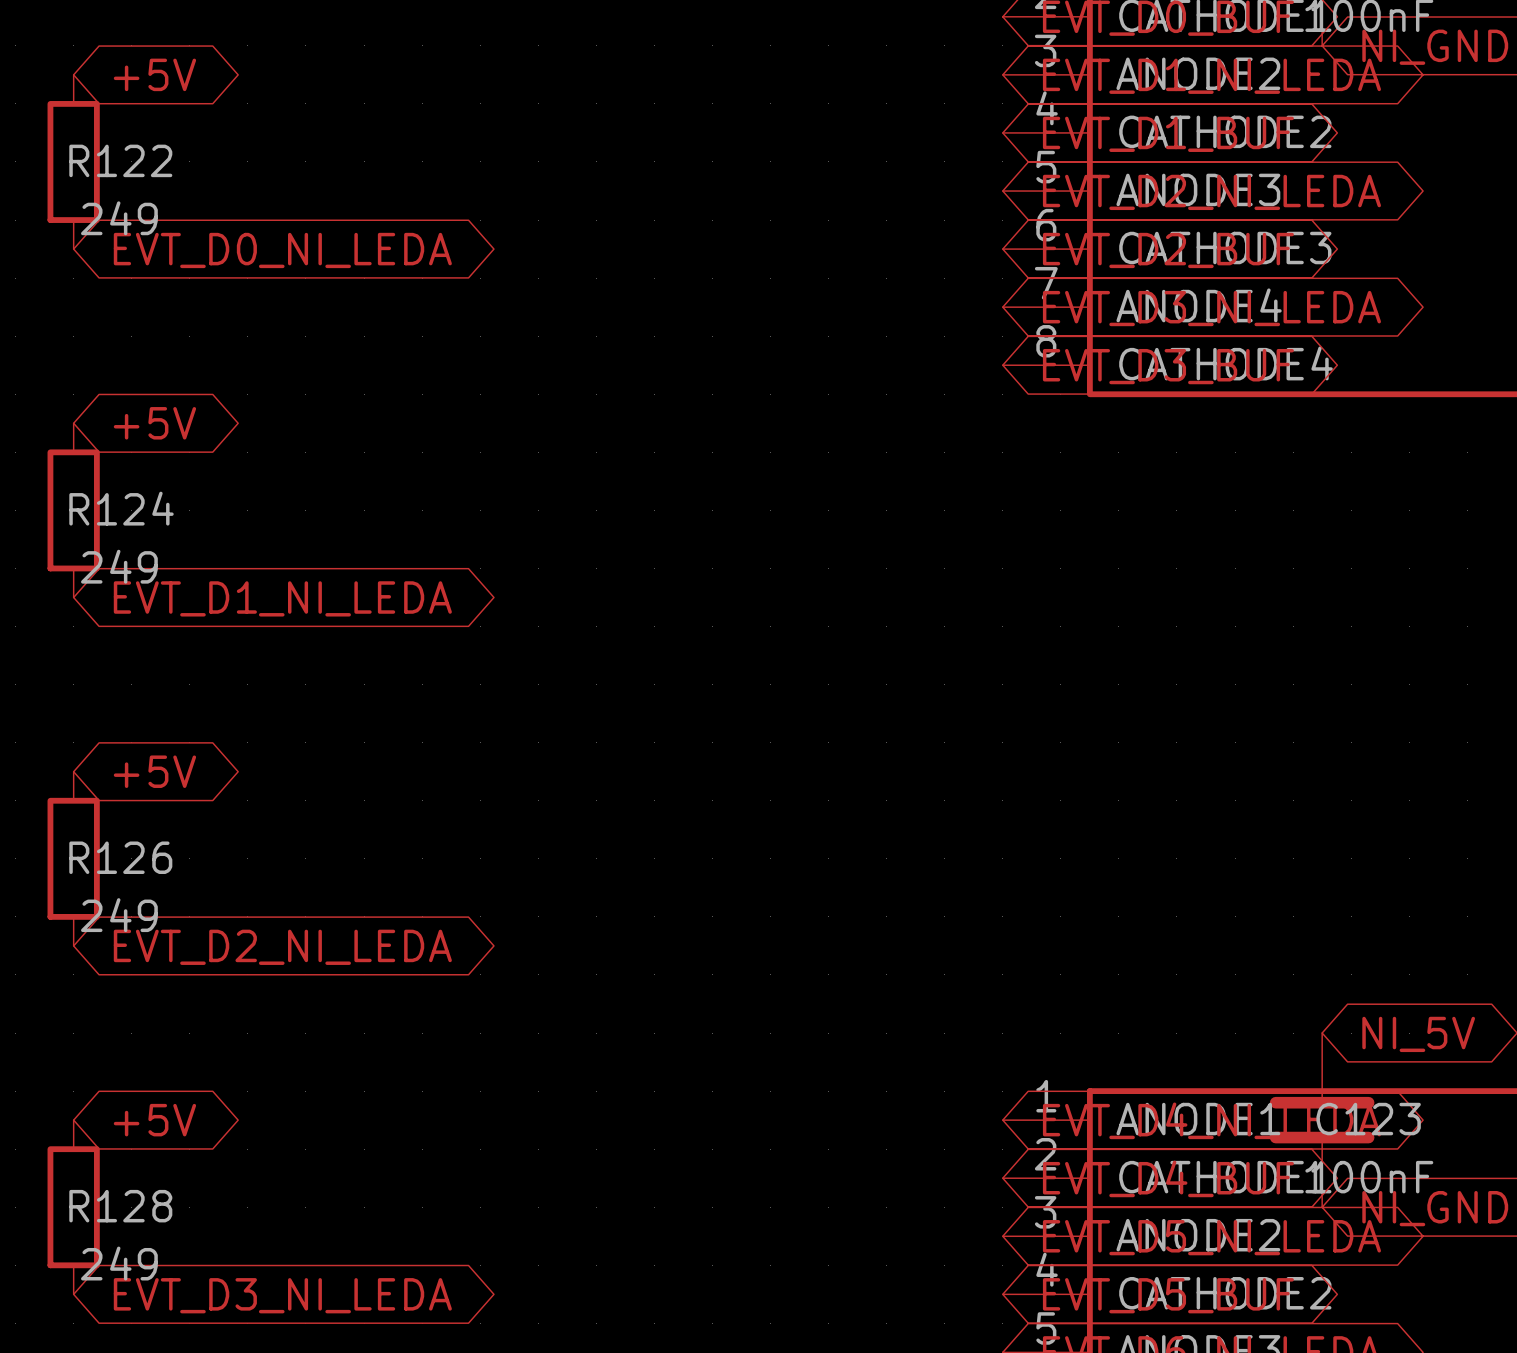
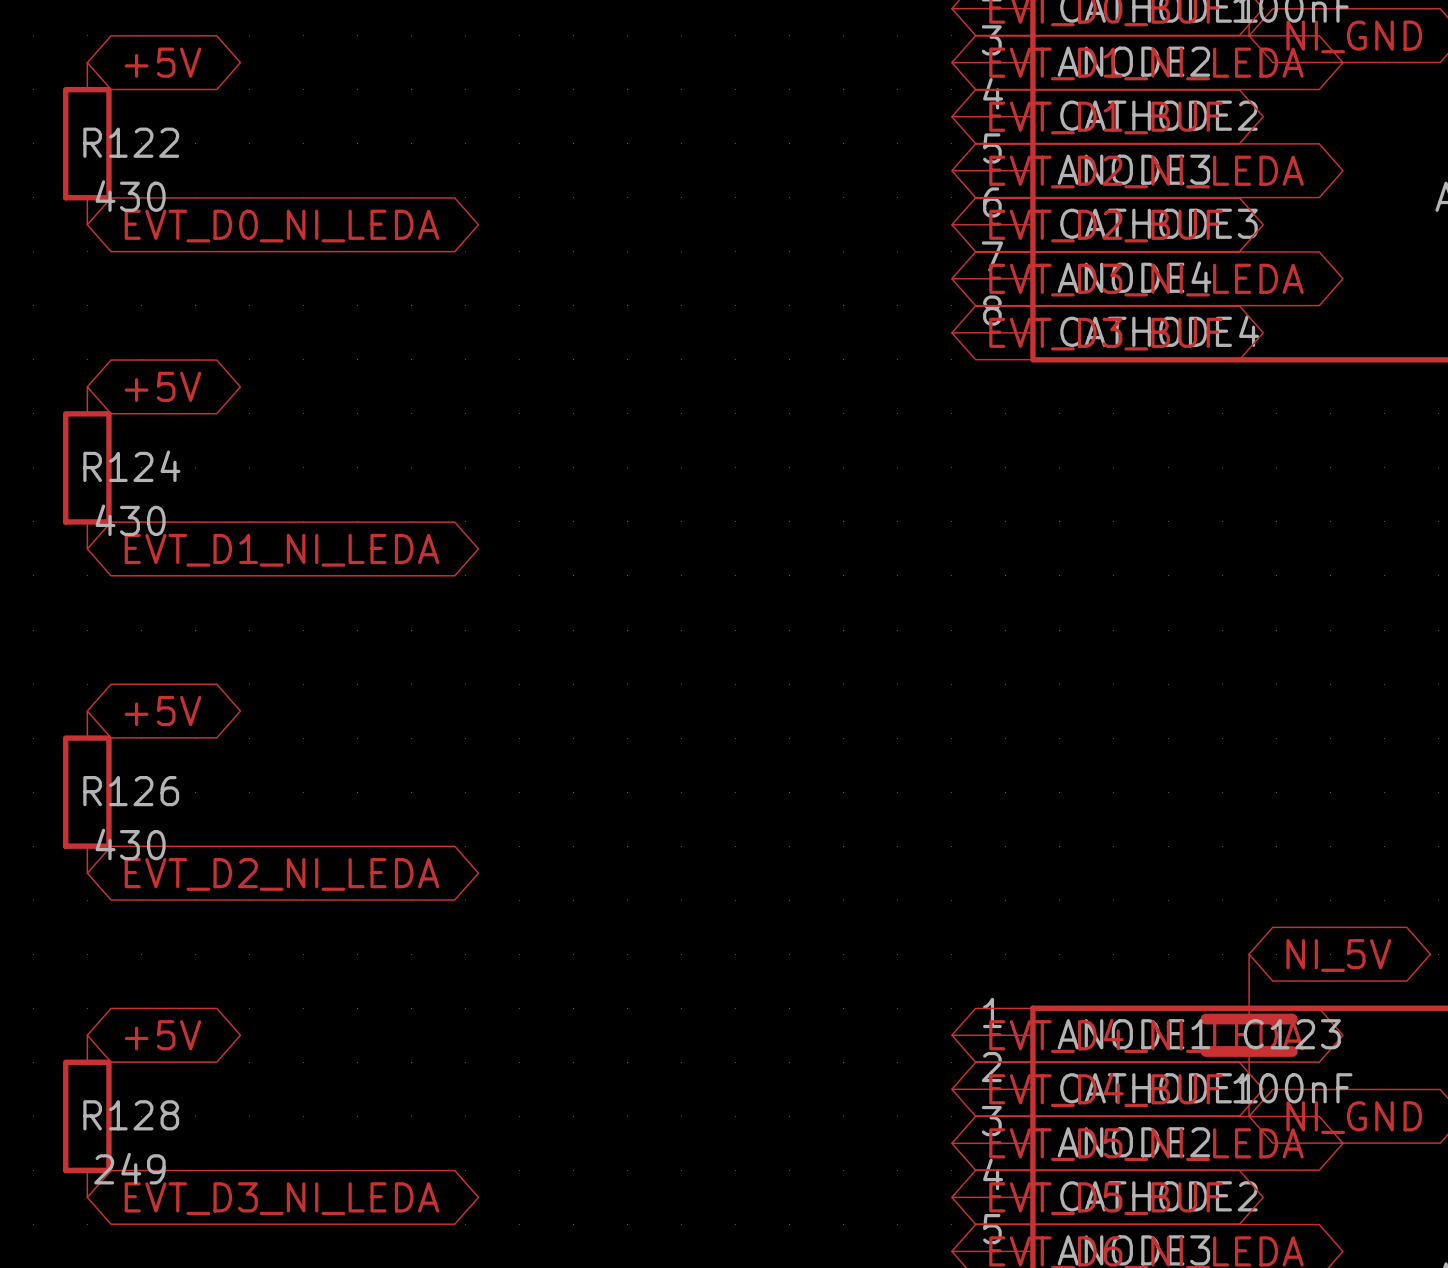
R122 value: 249 (119, 218) -> 430 (130, 196)
R124 value: 249 (119, 566) -> 430 (130, 520)
R126 value: 249 (119, 915) -> 430 (130, 844)

